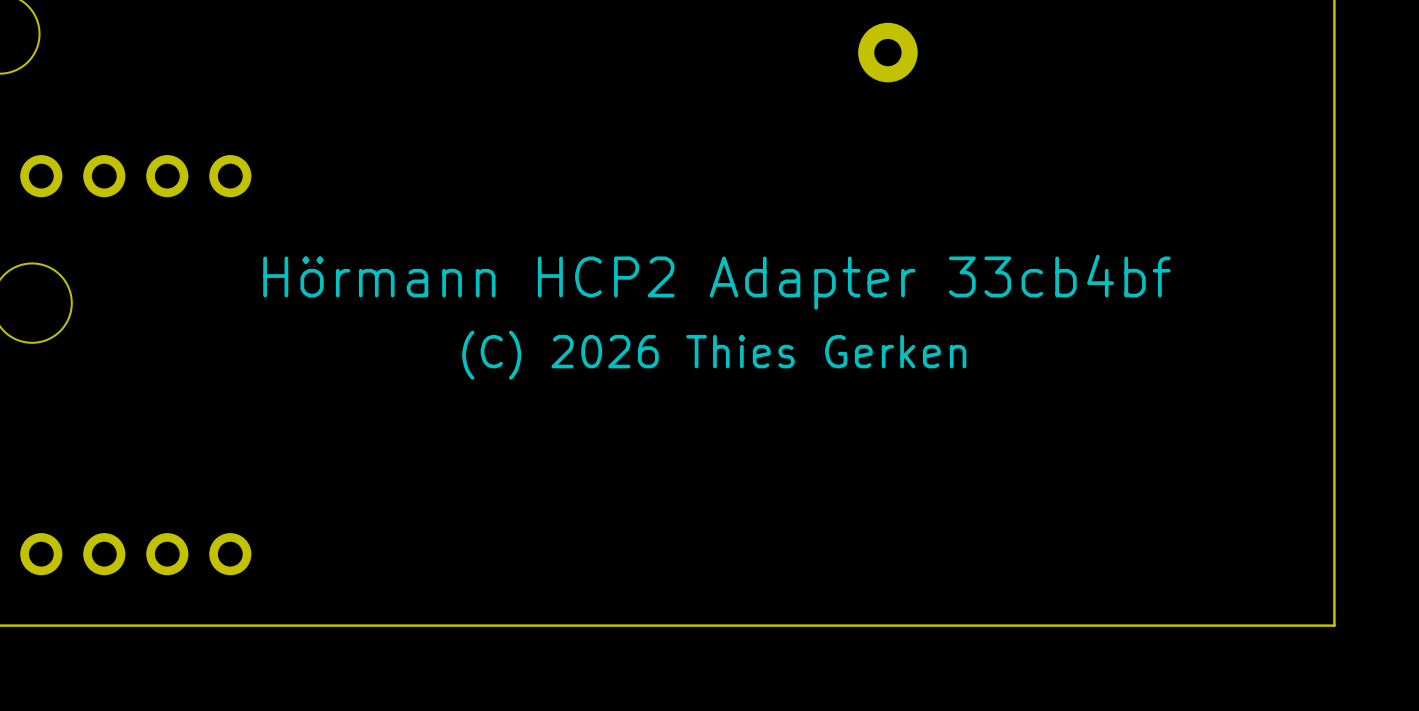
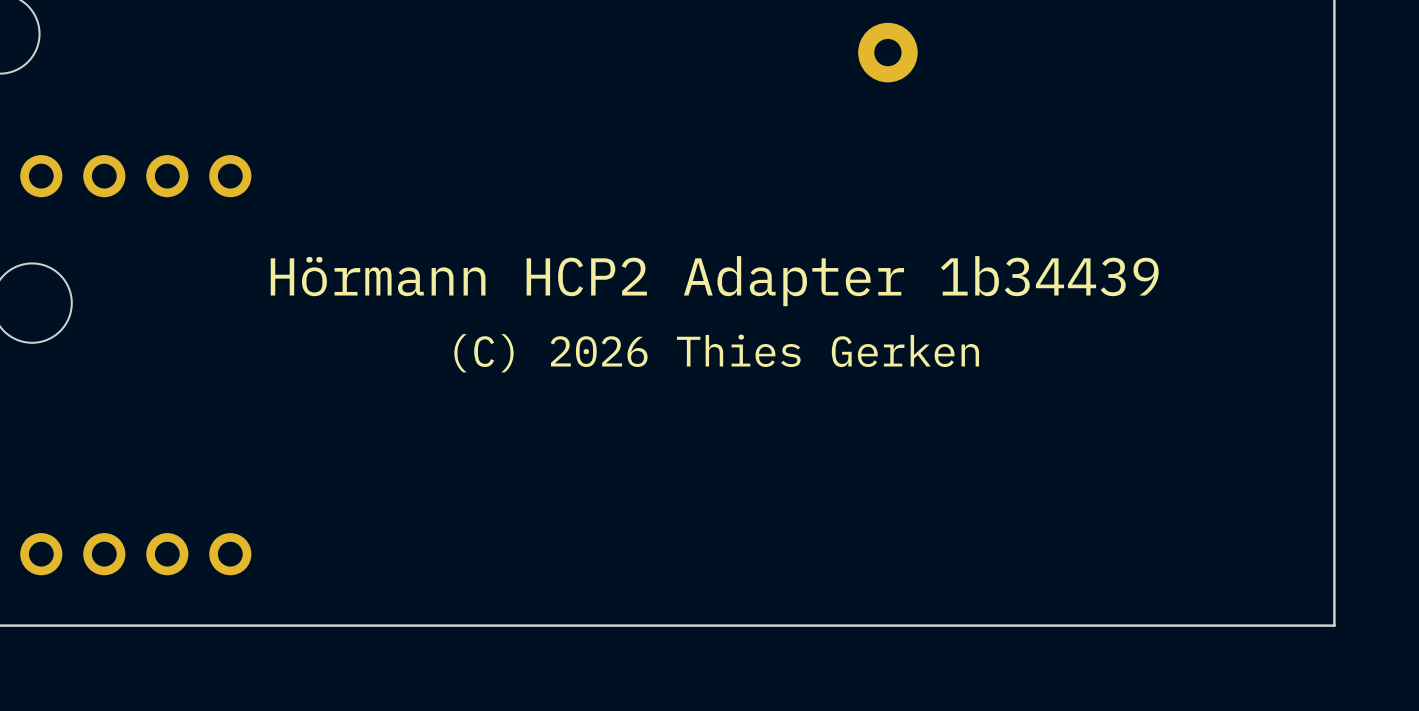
text: Hörmann HCP2 Adapter 33cb4bf (716, 282) -> Hörmann HCP2 Adapter 1b34439 (714, 281)

